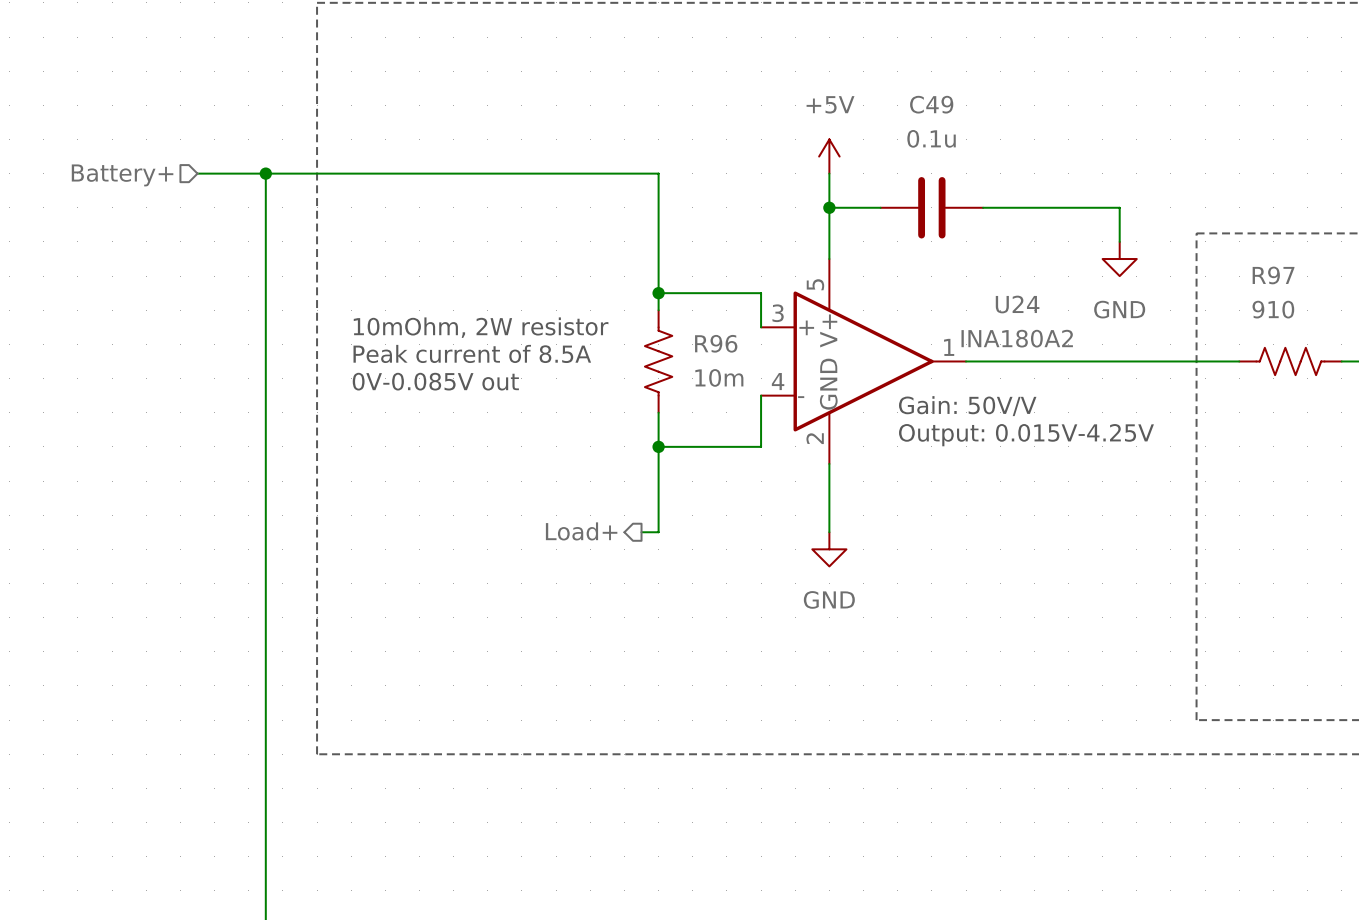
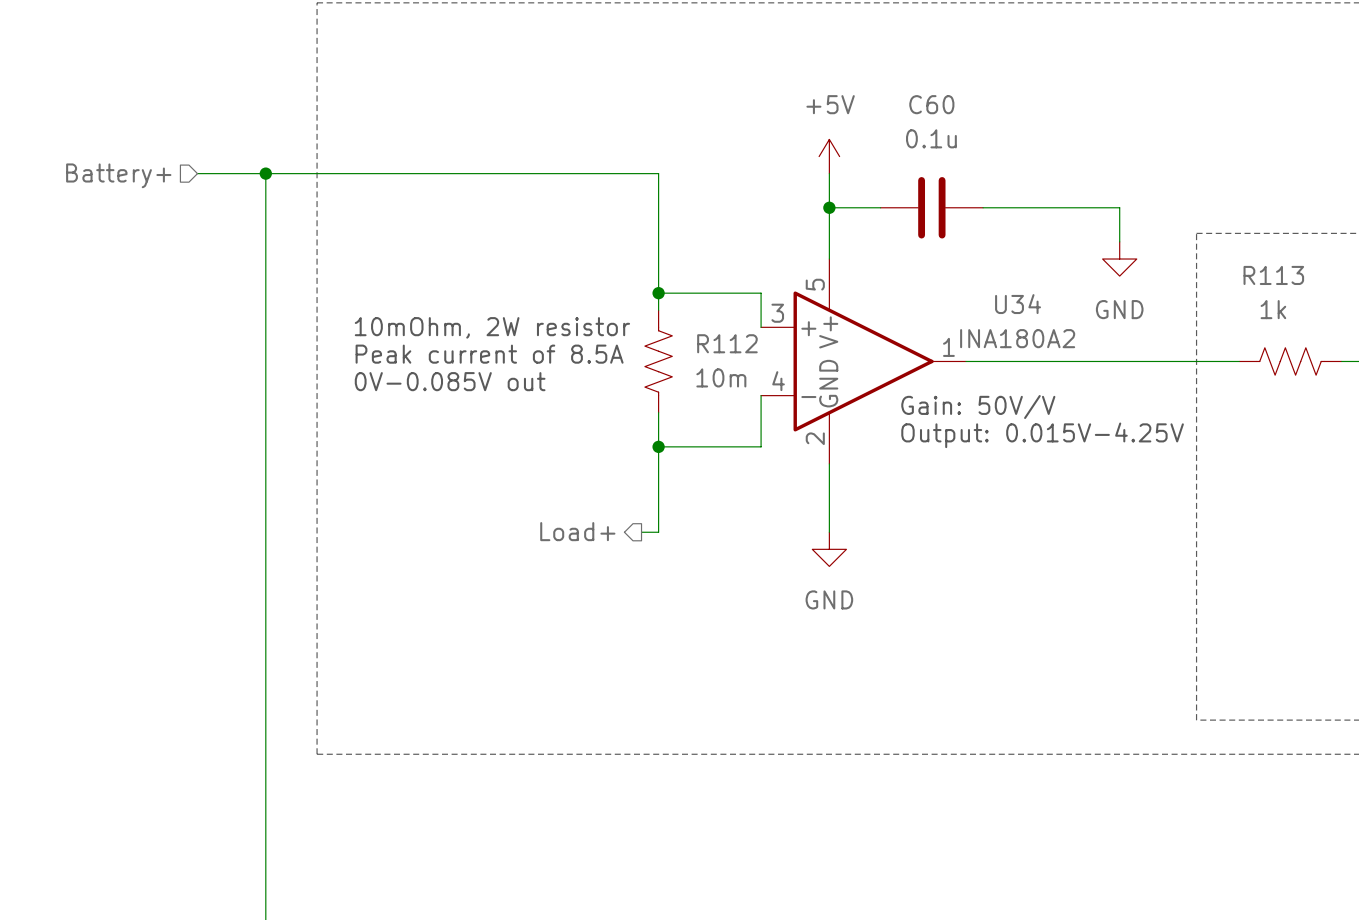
C49 name: C49 (931, 104) -> C60 (931, 104)
R97 name: R97 (1273, 275) -> R113 (1273, 275)
U24 name: U24 (1017, 304) -> U34 (1018, 304)
R97 value: 910 (1273, 309) -> 1k (1273, 309)
R96 name: R96 (716, 343) -> R112 (727, 343)

